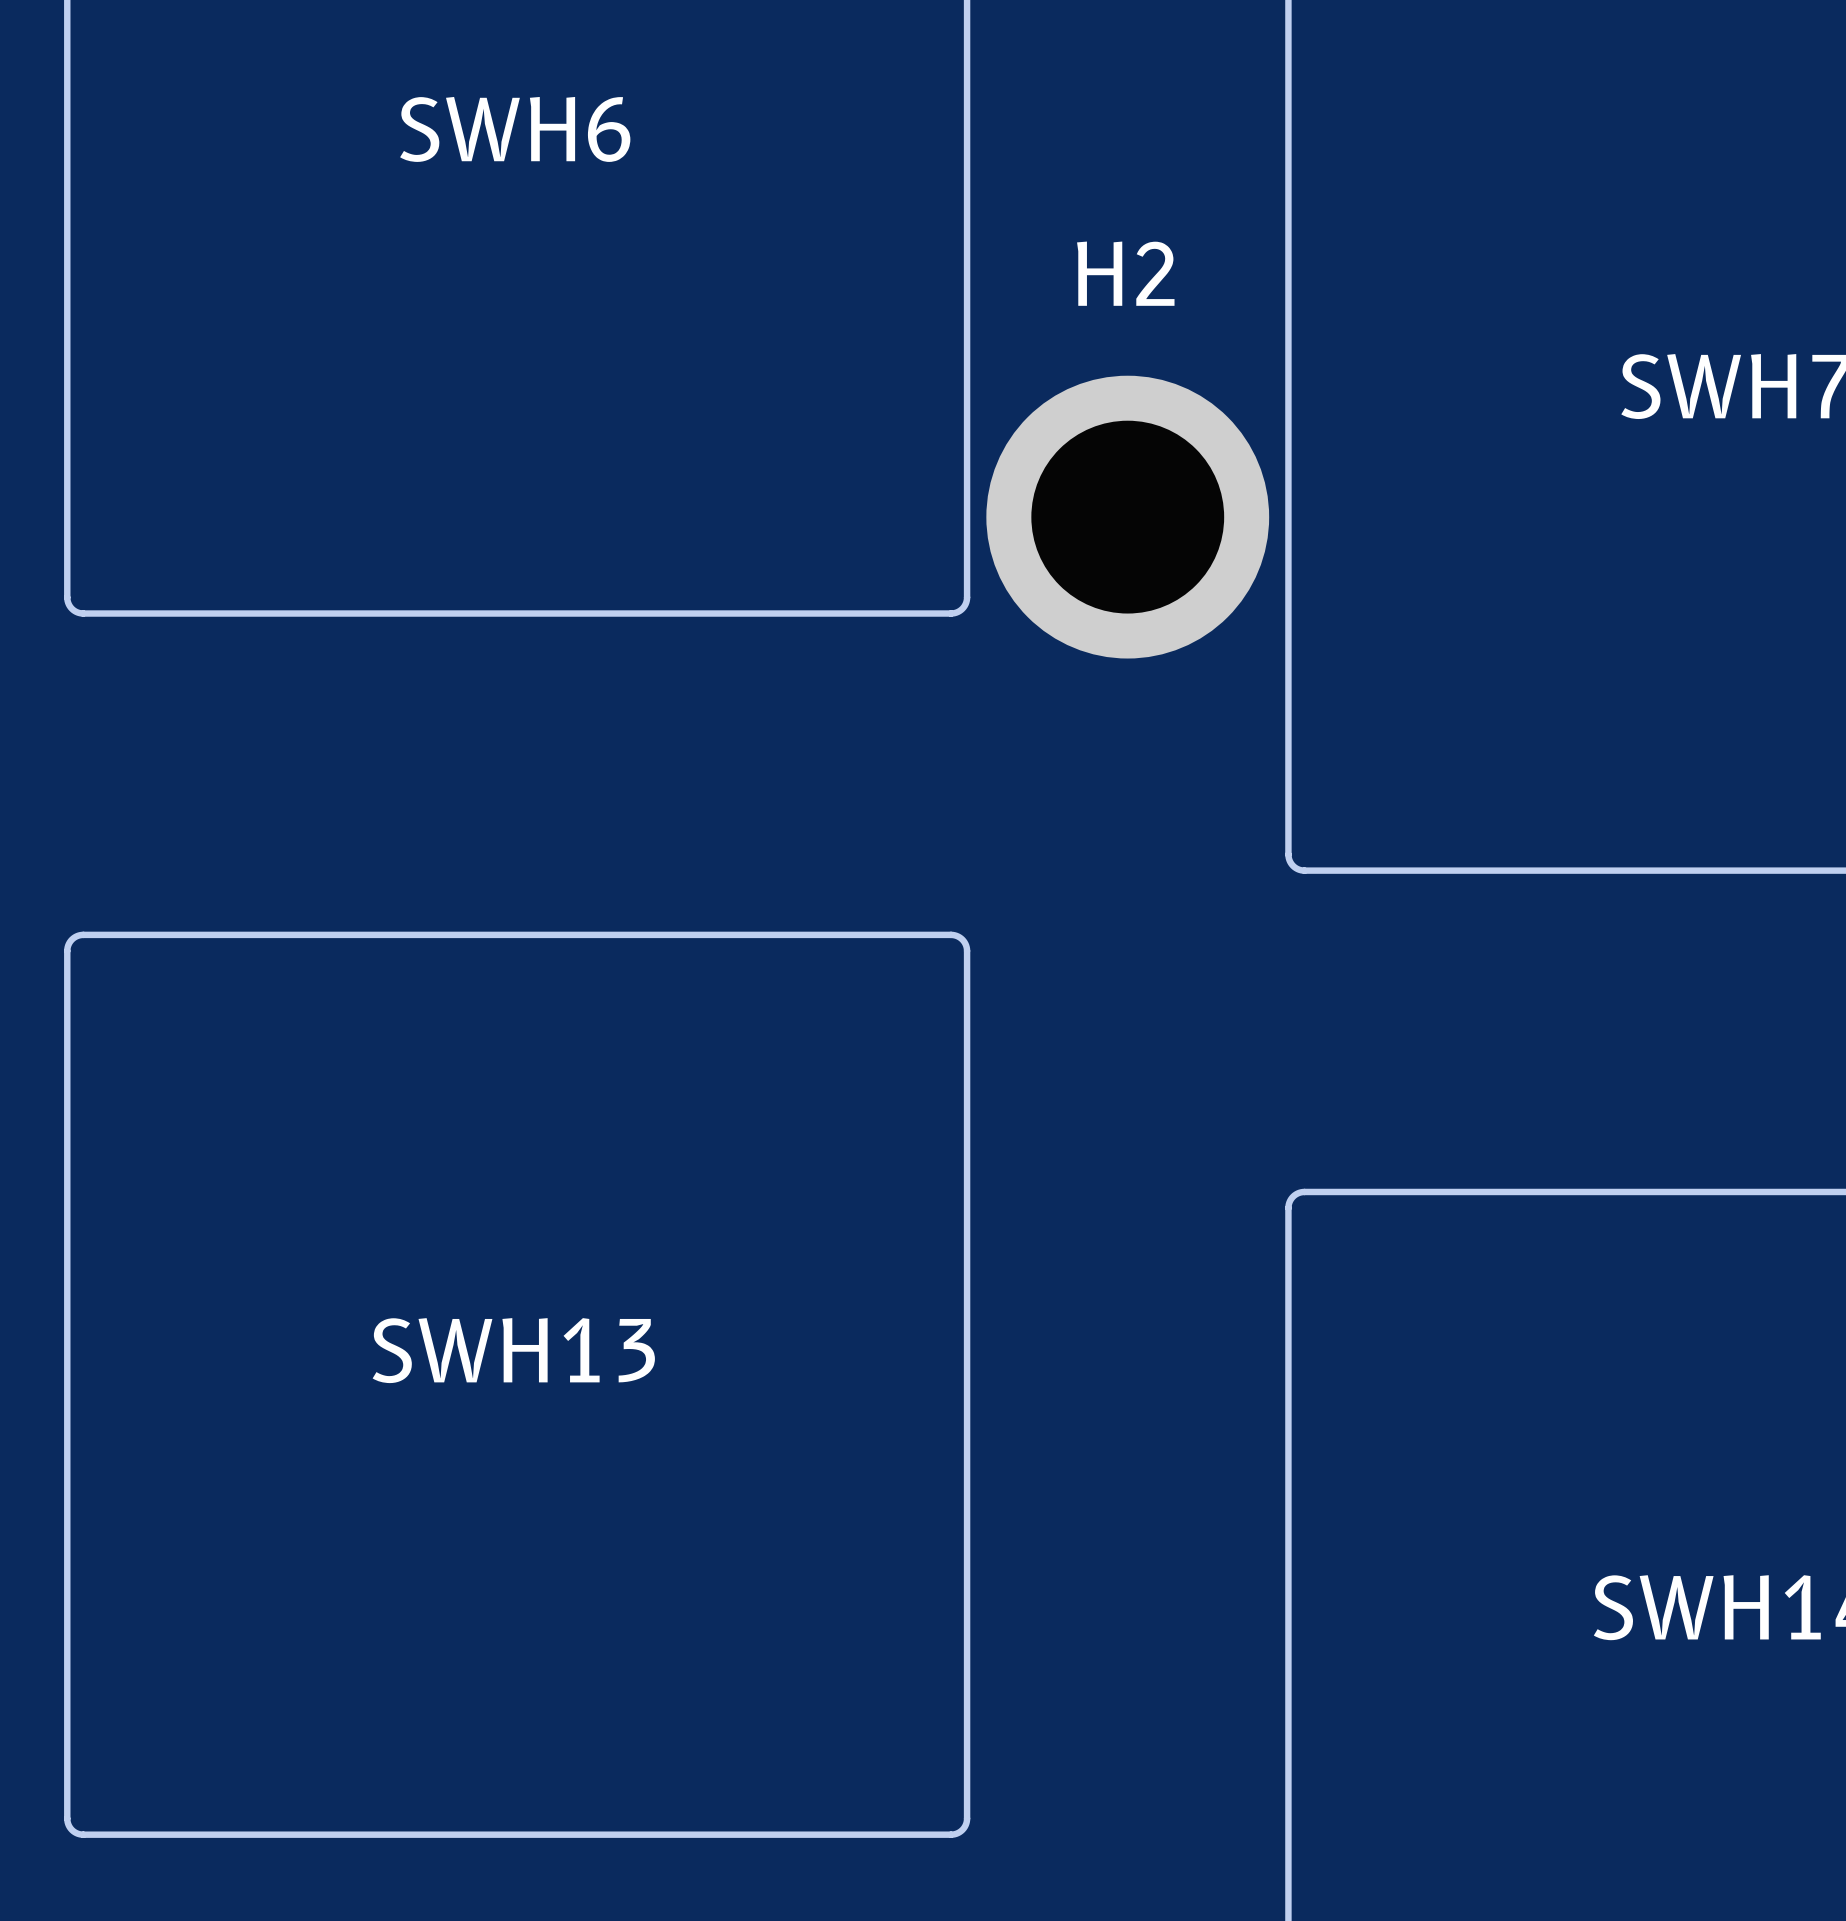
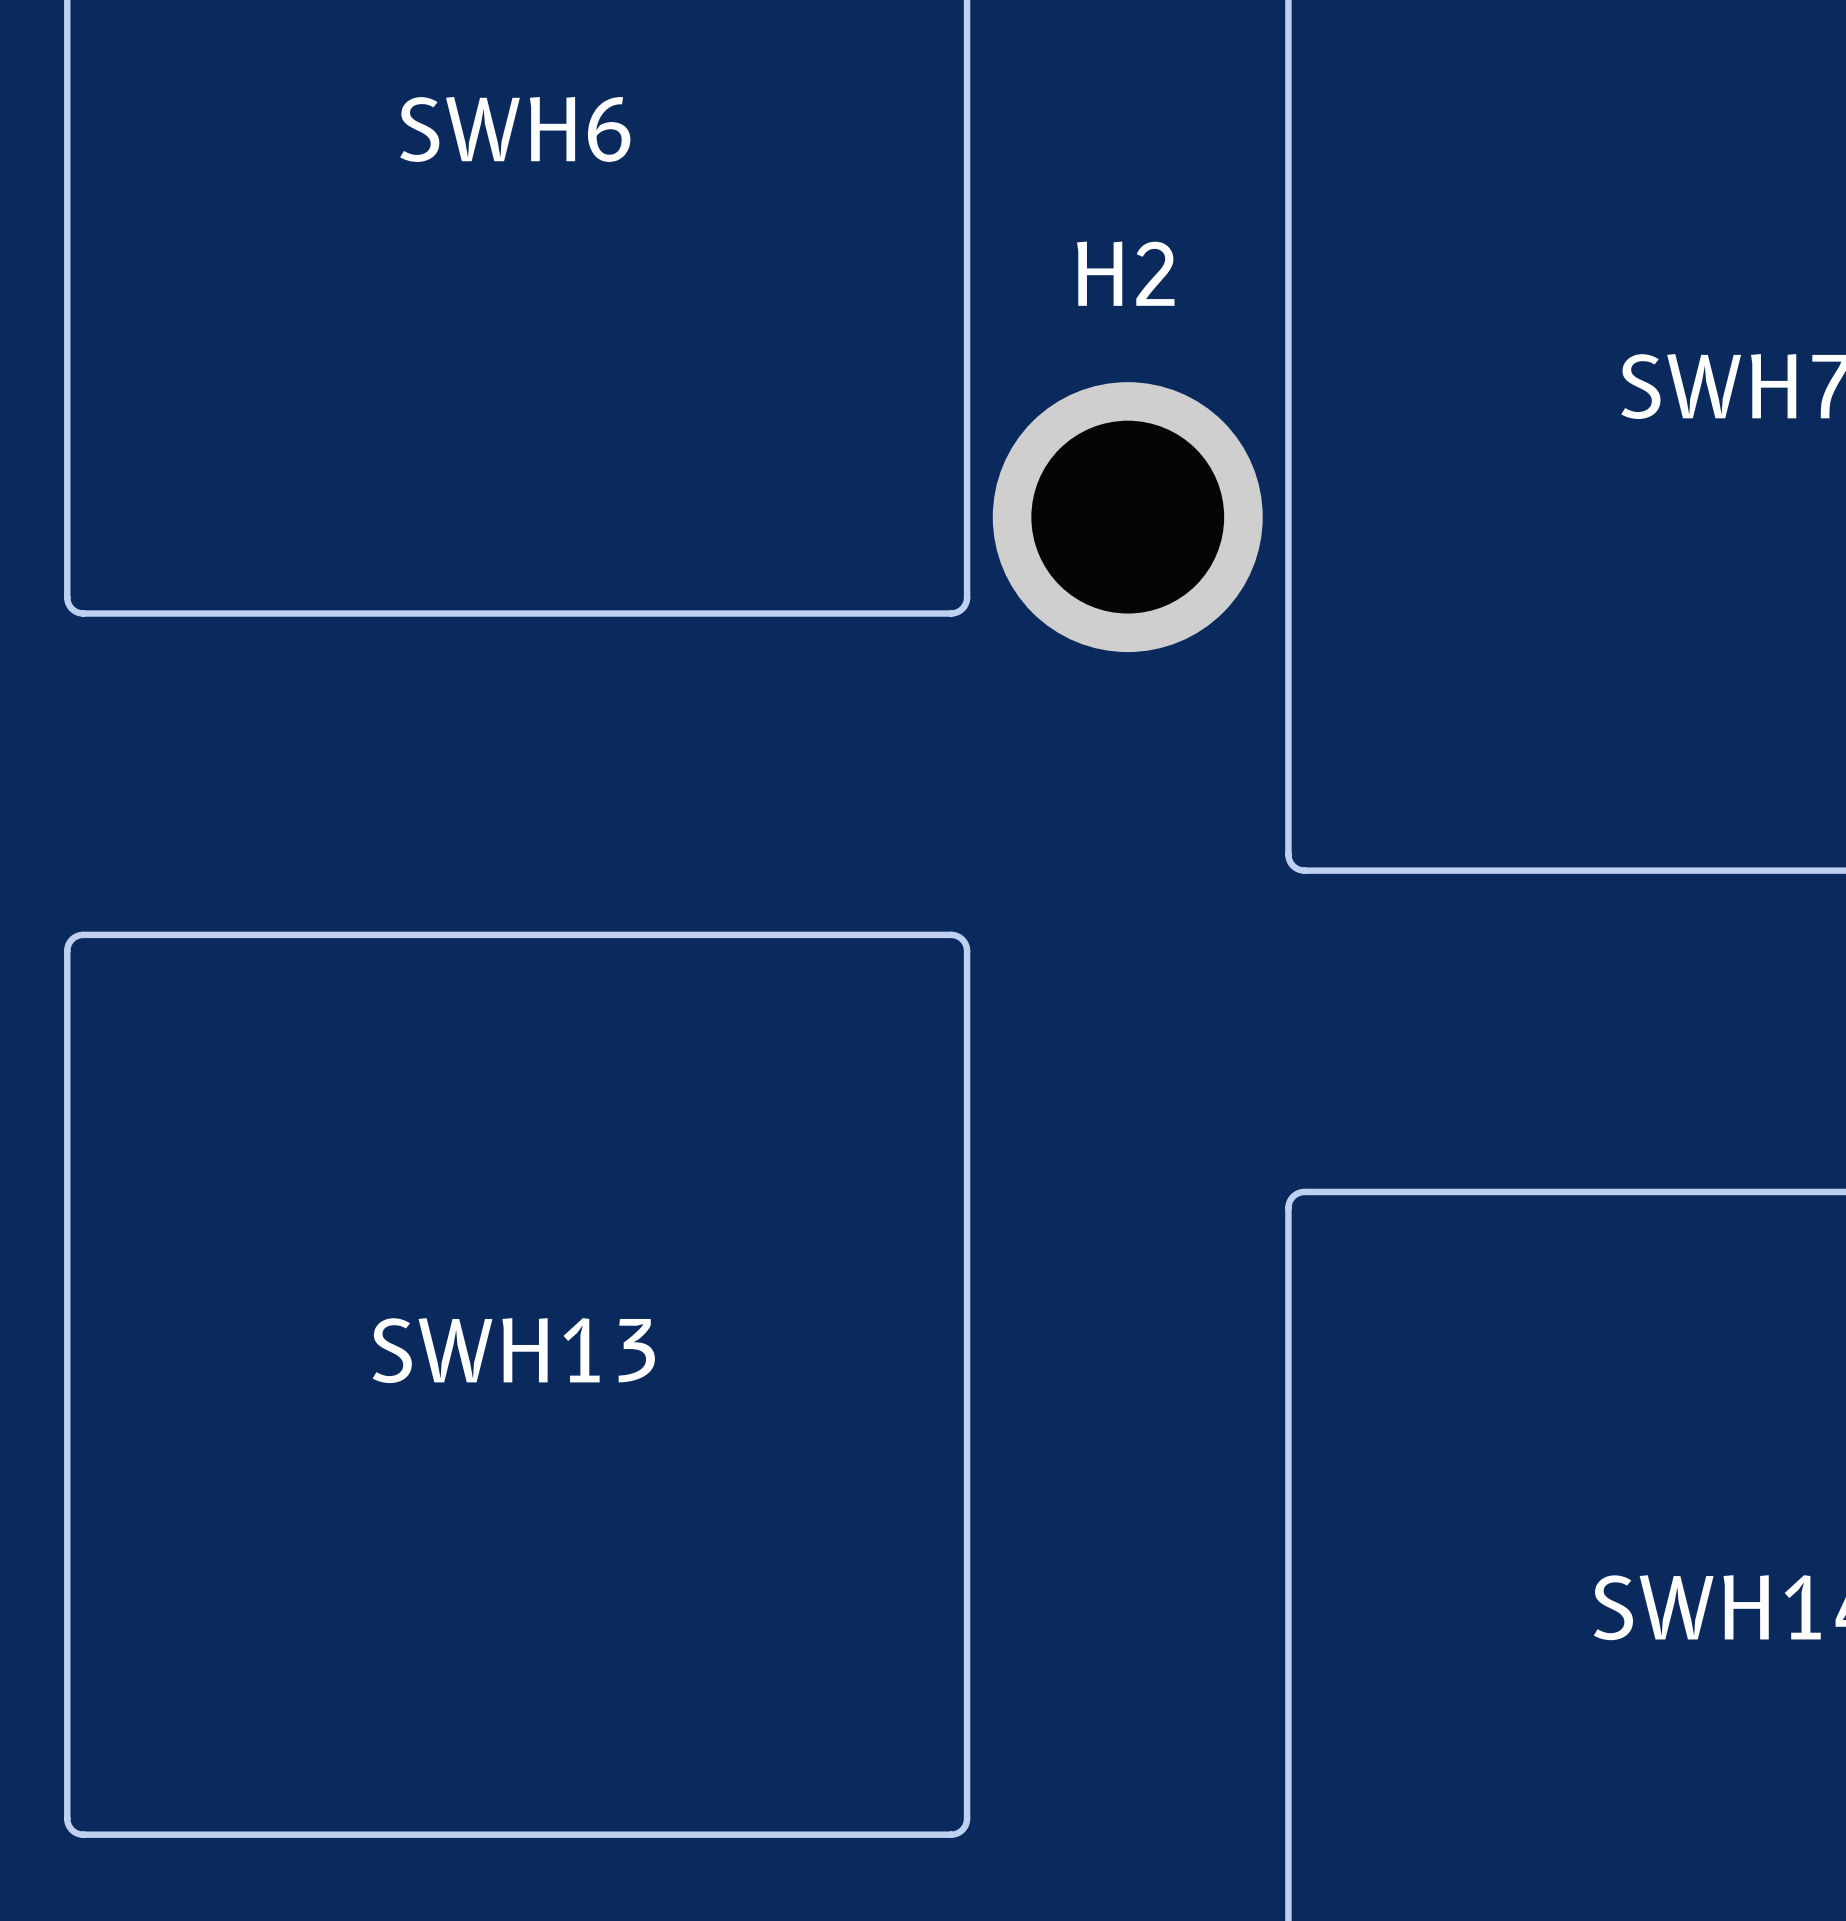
H2 footprint: [986, 375, 1270, 659] -> [992, 382, 1263, 653]

